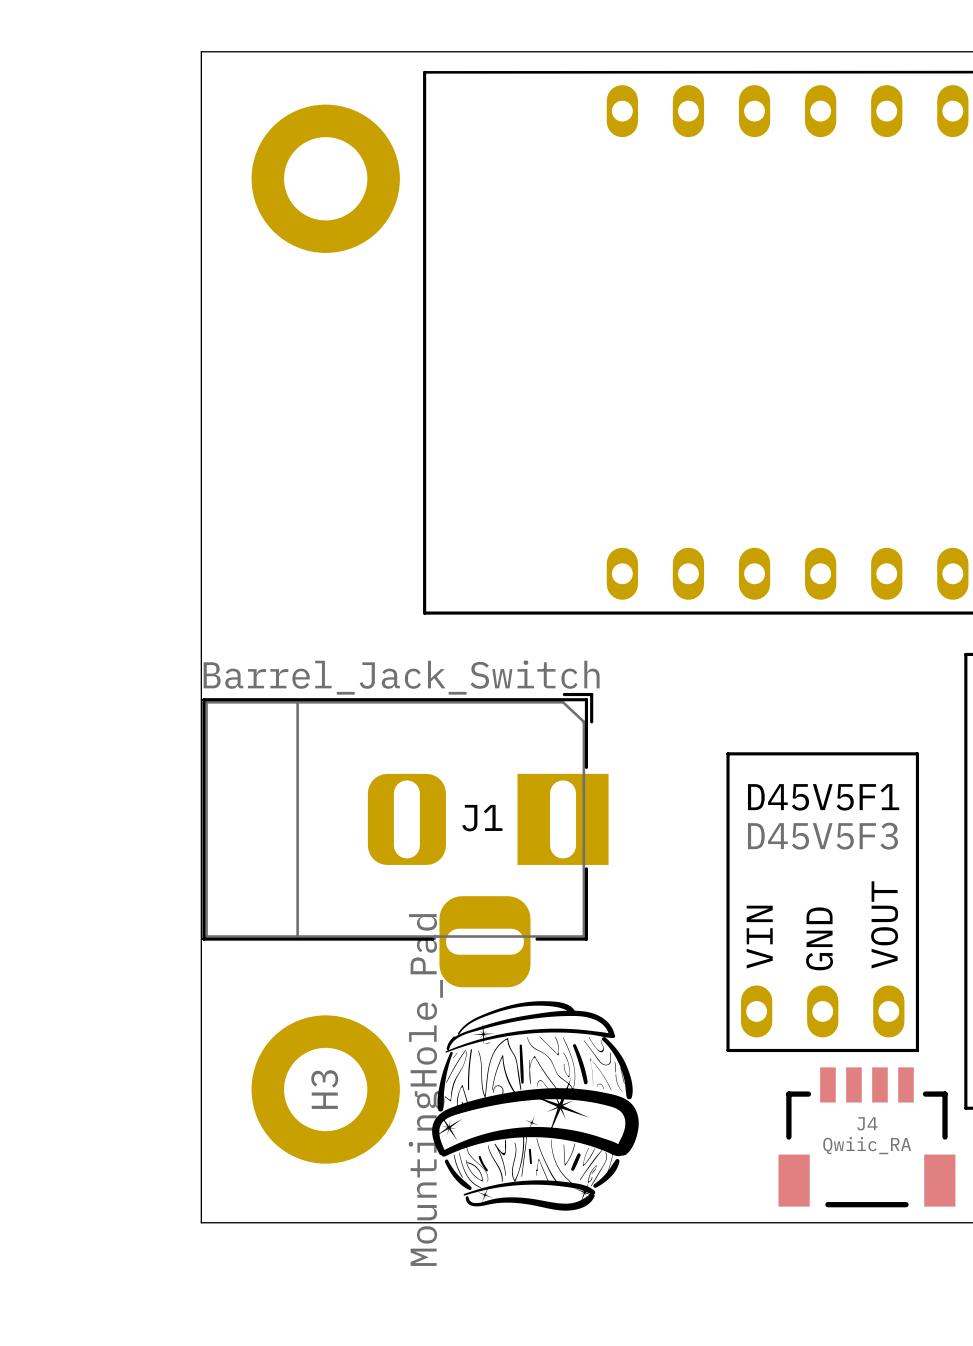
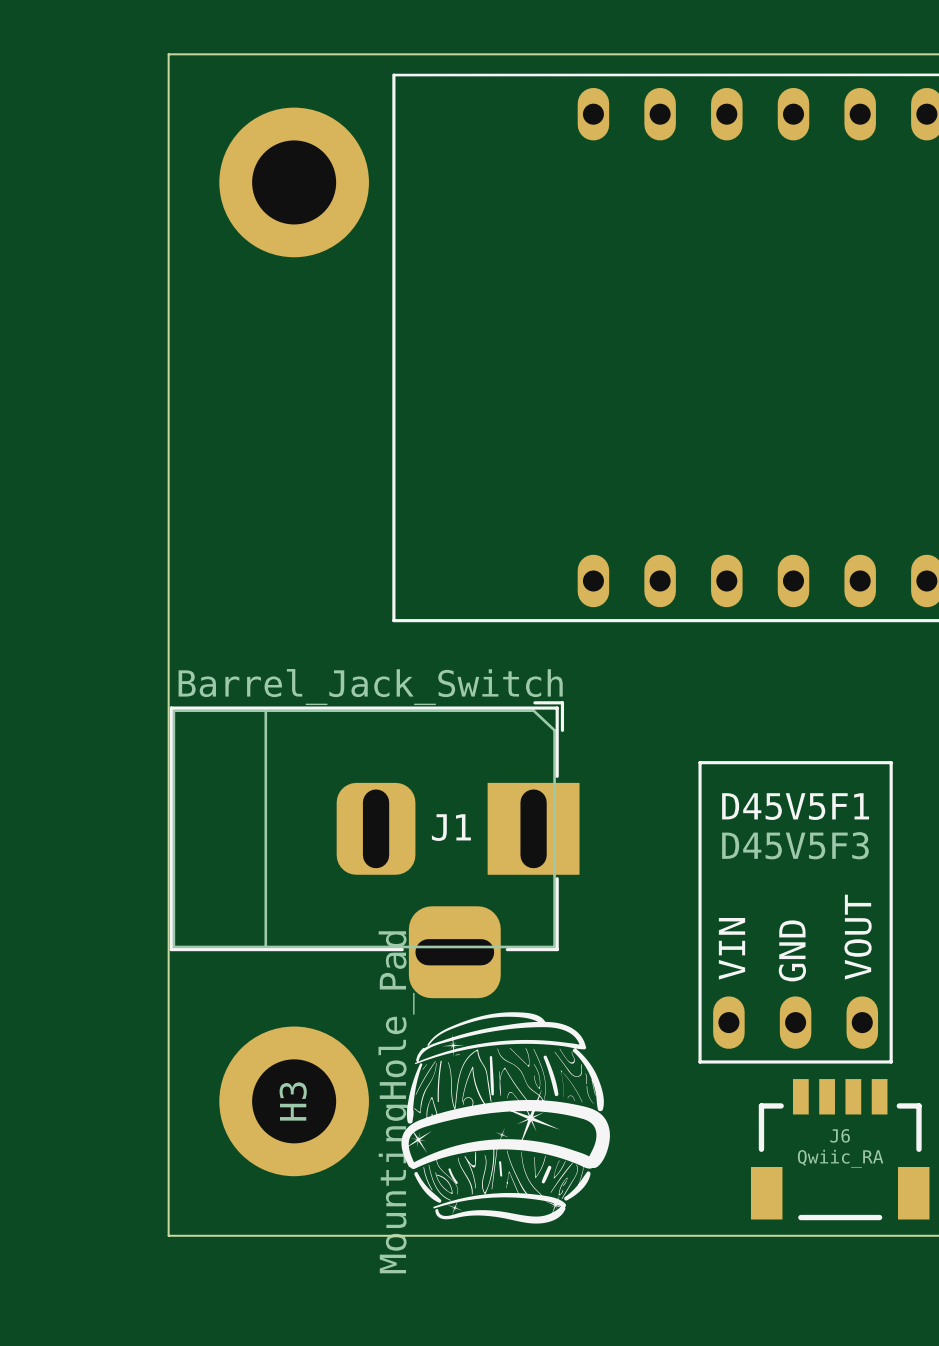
J4 name: J4 (867, 1123) -> J6 (840, 1135)

